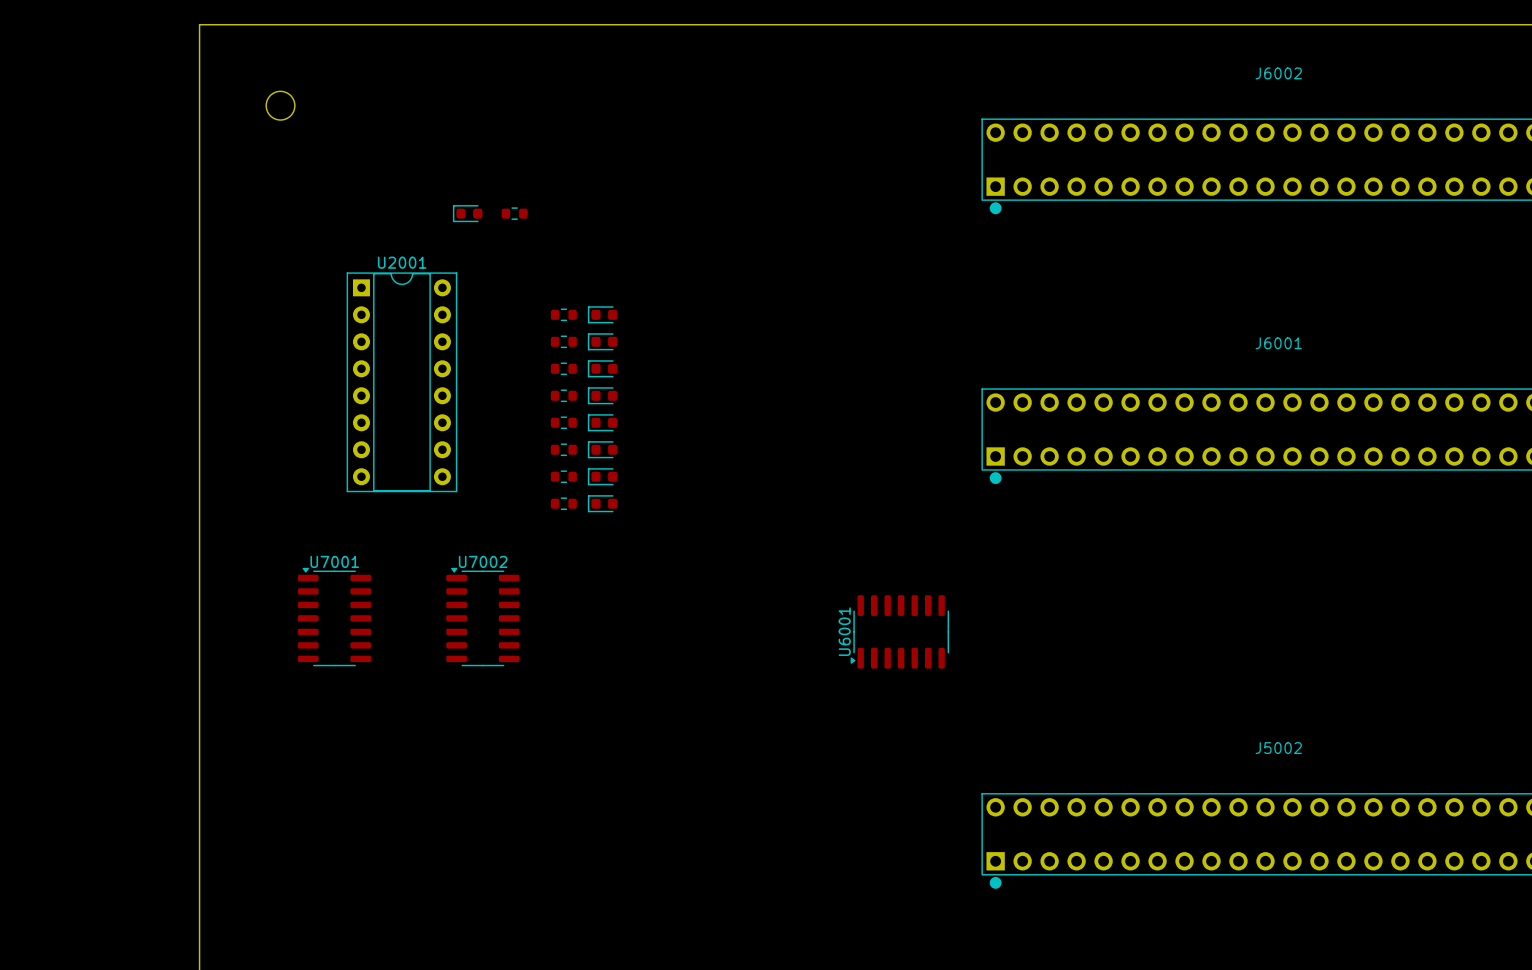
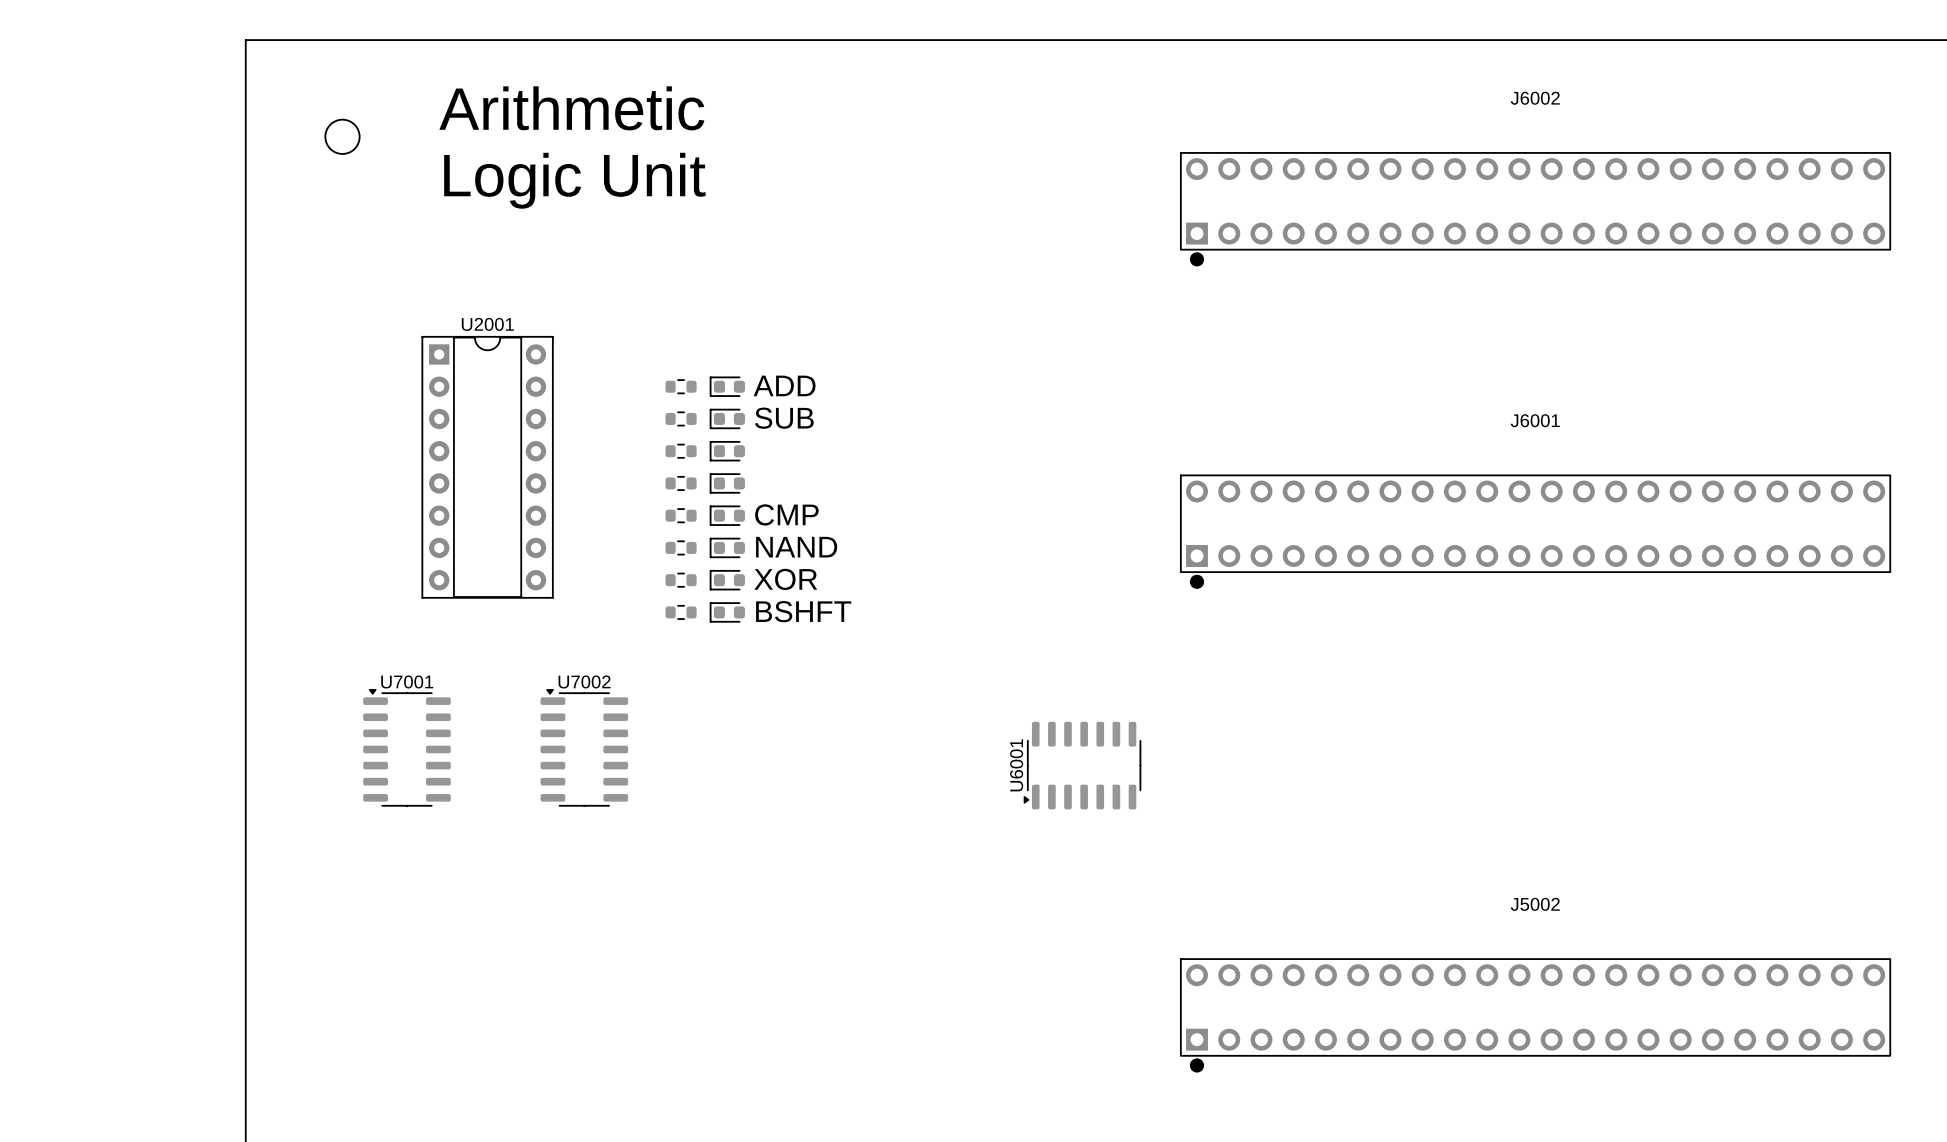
text: none -> Arithmetic (571, 108)
text: none -> Logic Unit (574, 180)
part: (467, 213) -> none
part: (514, 213) -> none
text: none -> ADD (784, 385)
text: none -> SUB (784, 418)
text: none -> CMP (786, 514)
text: none -> NAND (796, 547)
text: none -> XOR (785, 579)
text: none -> BSHFT (803, 611)

